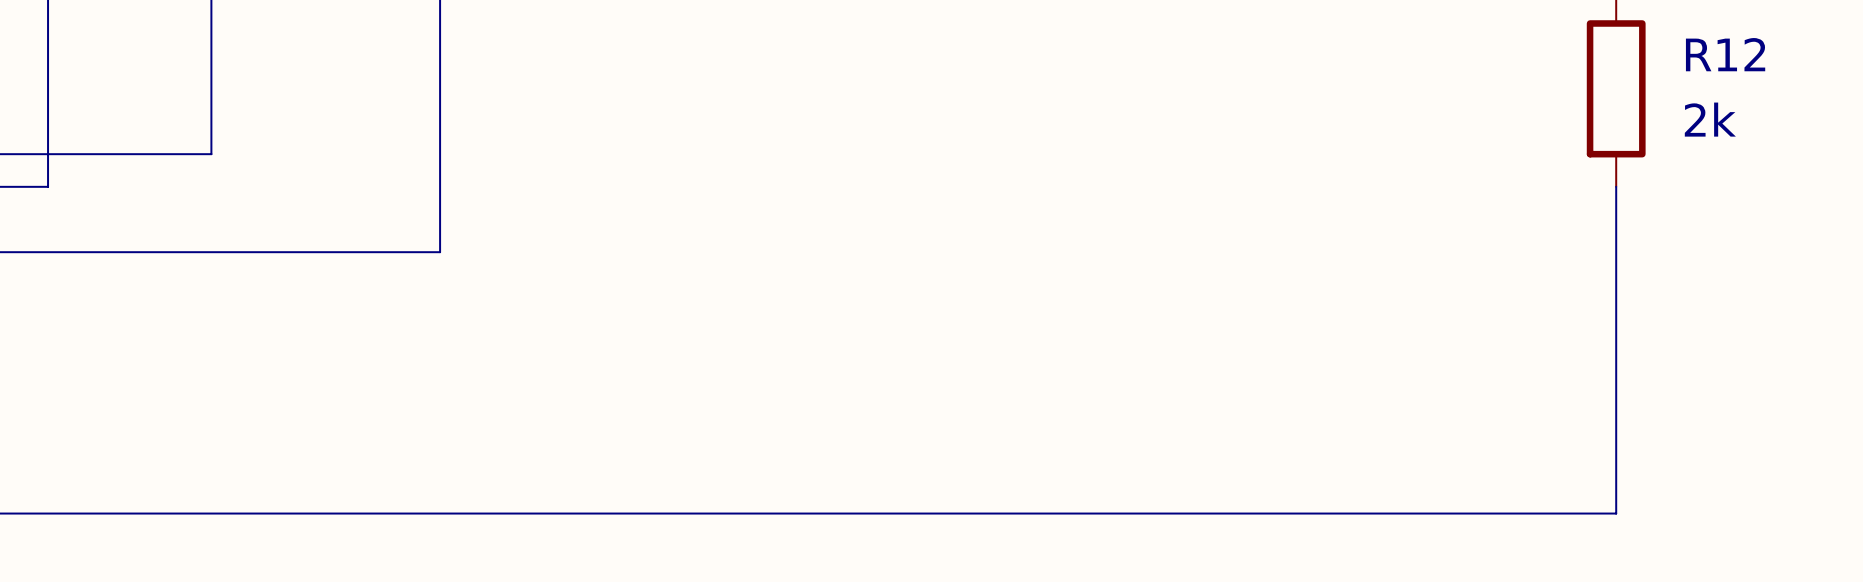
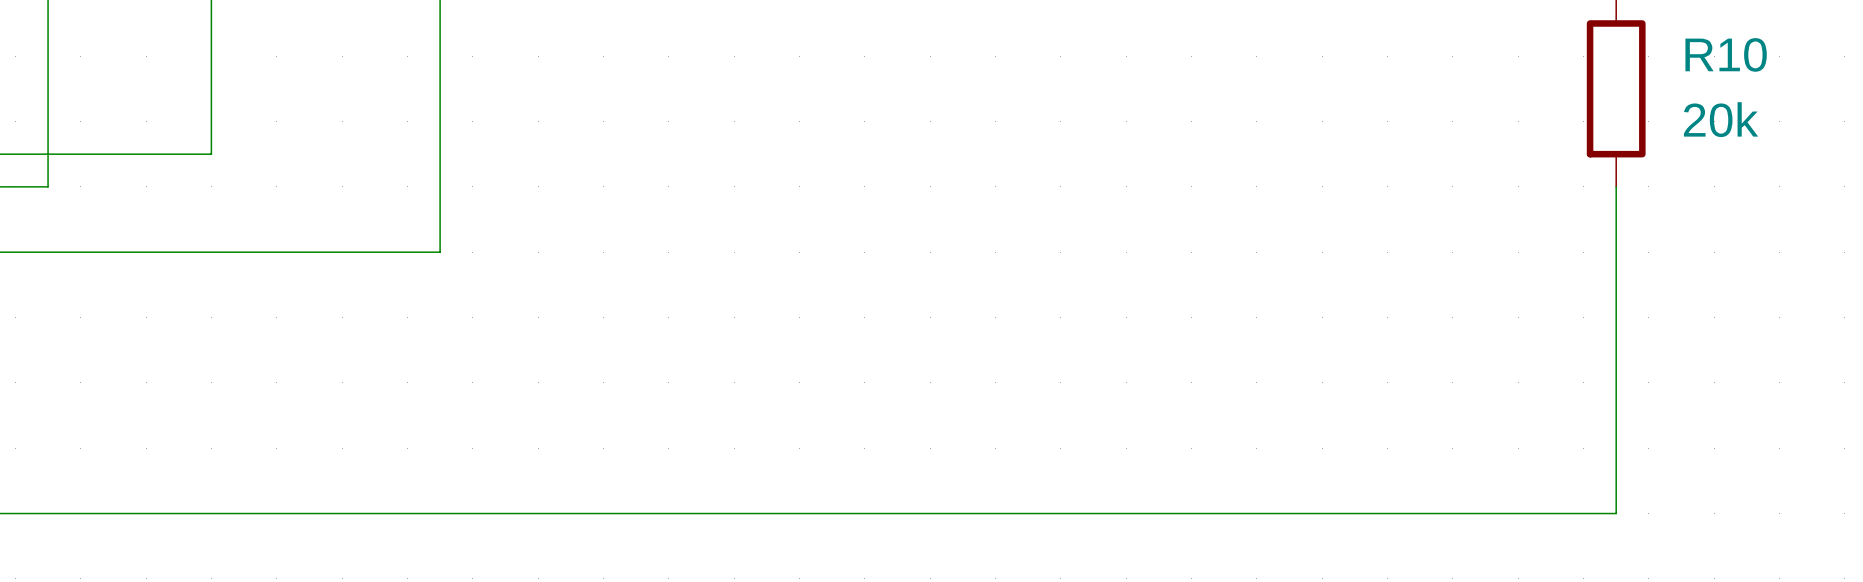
R12 name: R12 (1725, 54) -> R10 (1726, 54)
R12 value: 2k (1710, 119) -> 20k (1721, 119)

